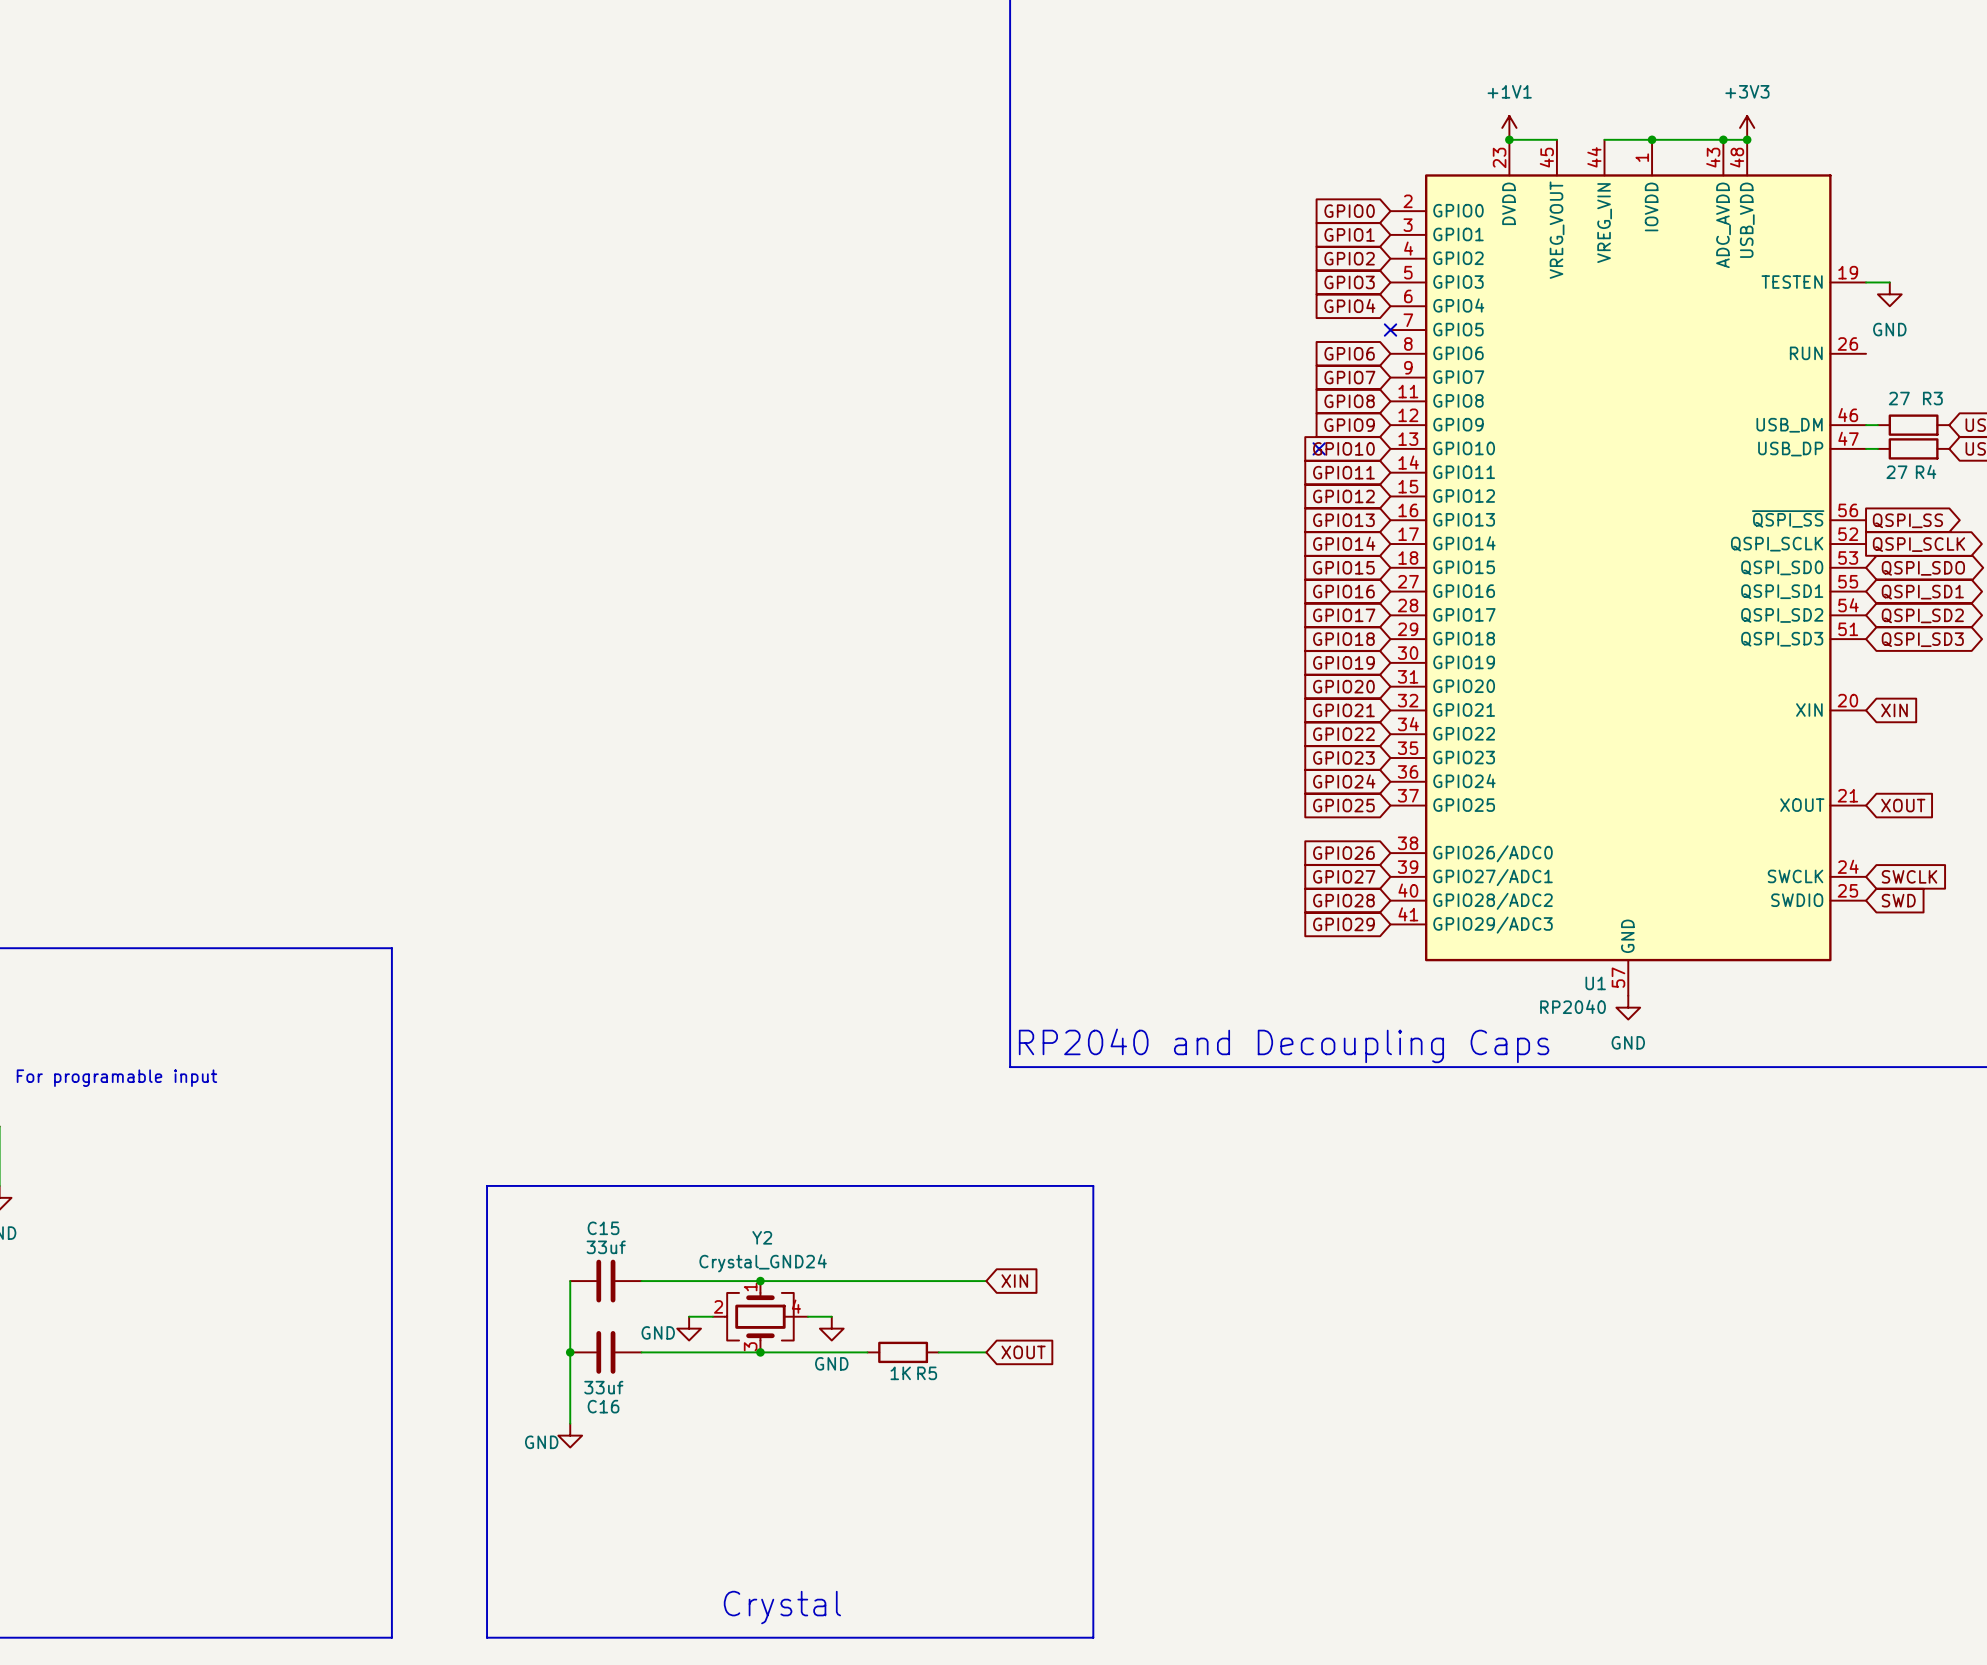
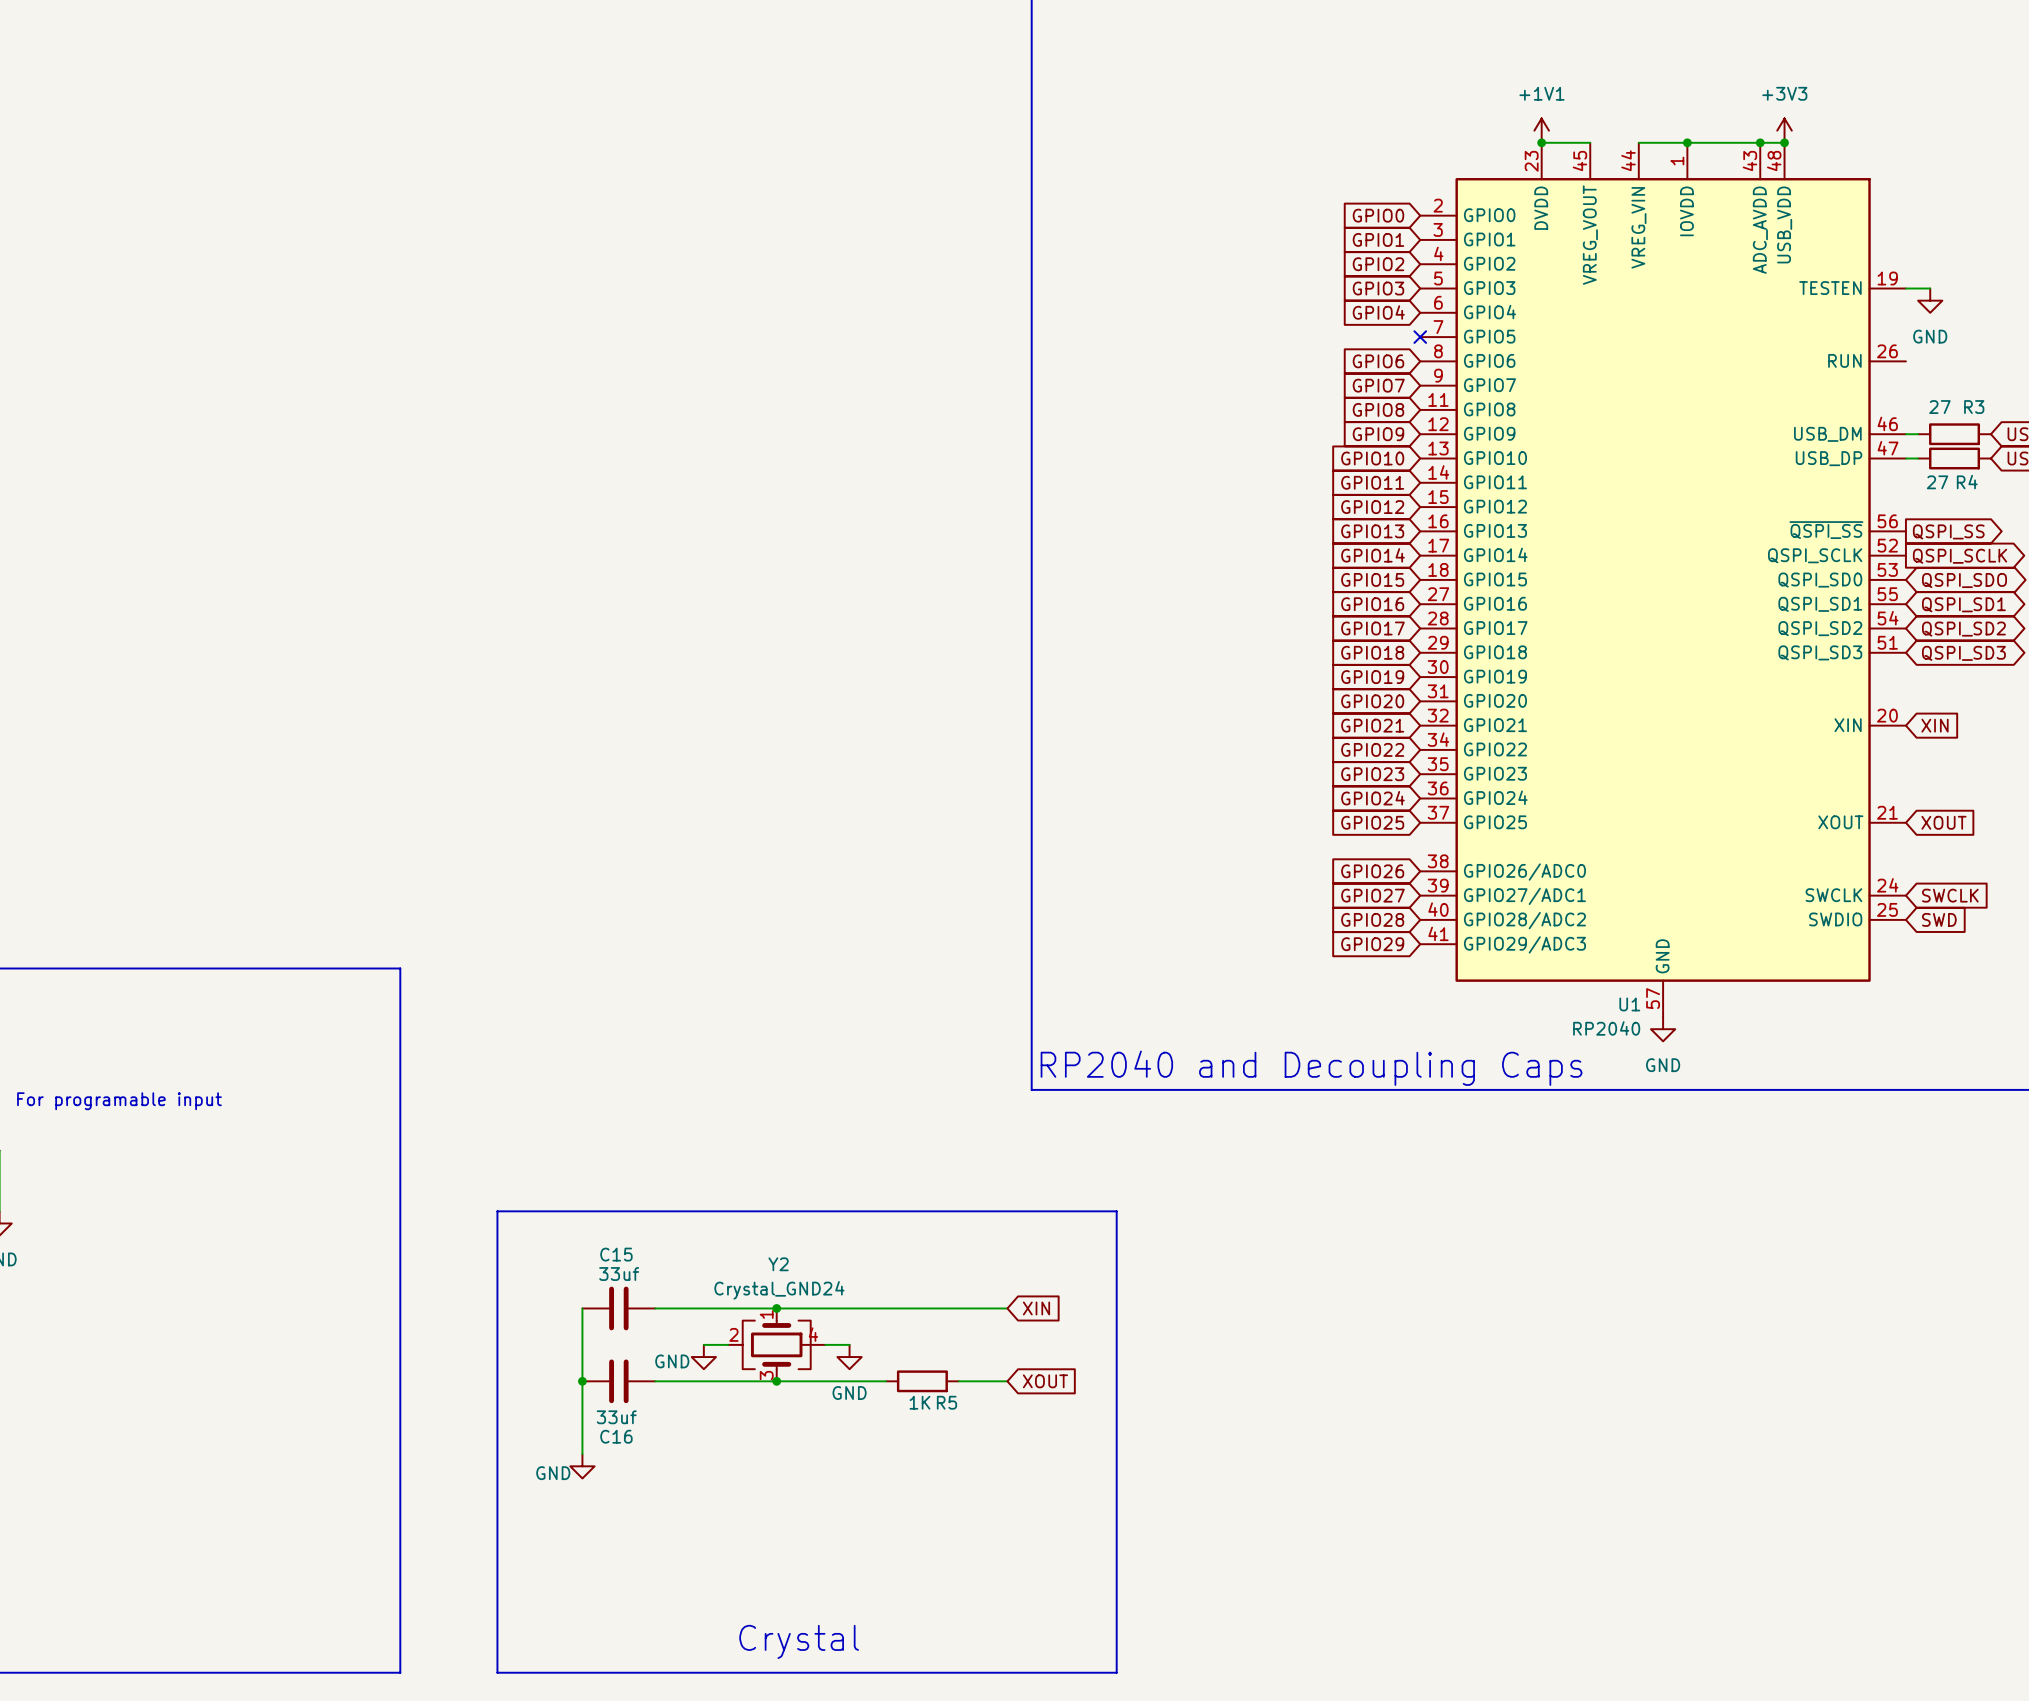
no-connect mark: (1319, 448) -> none

